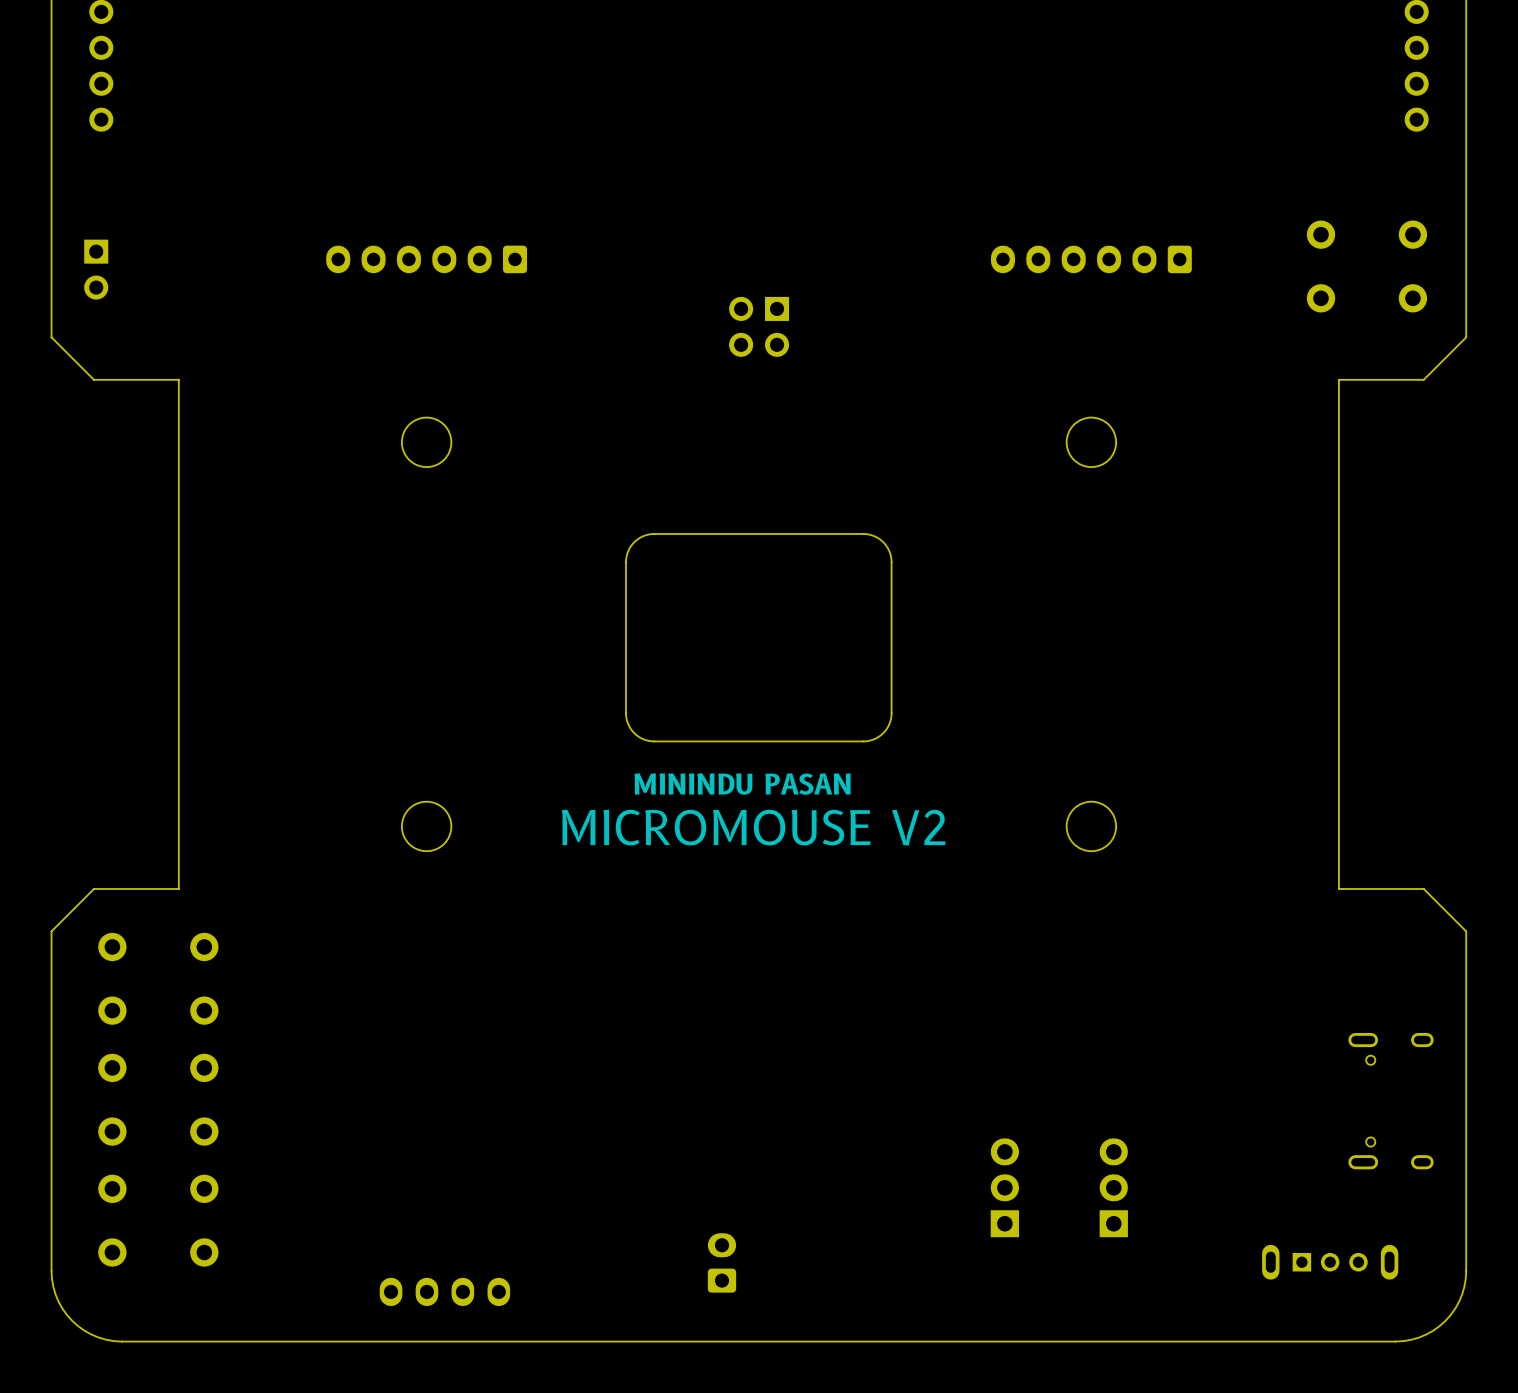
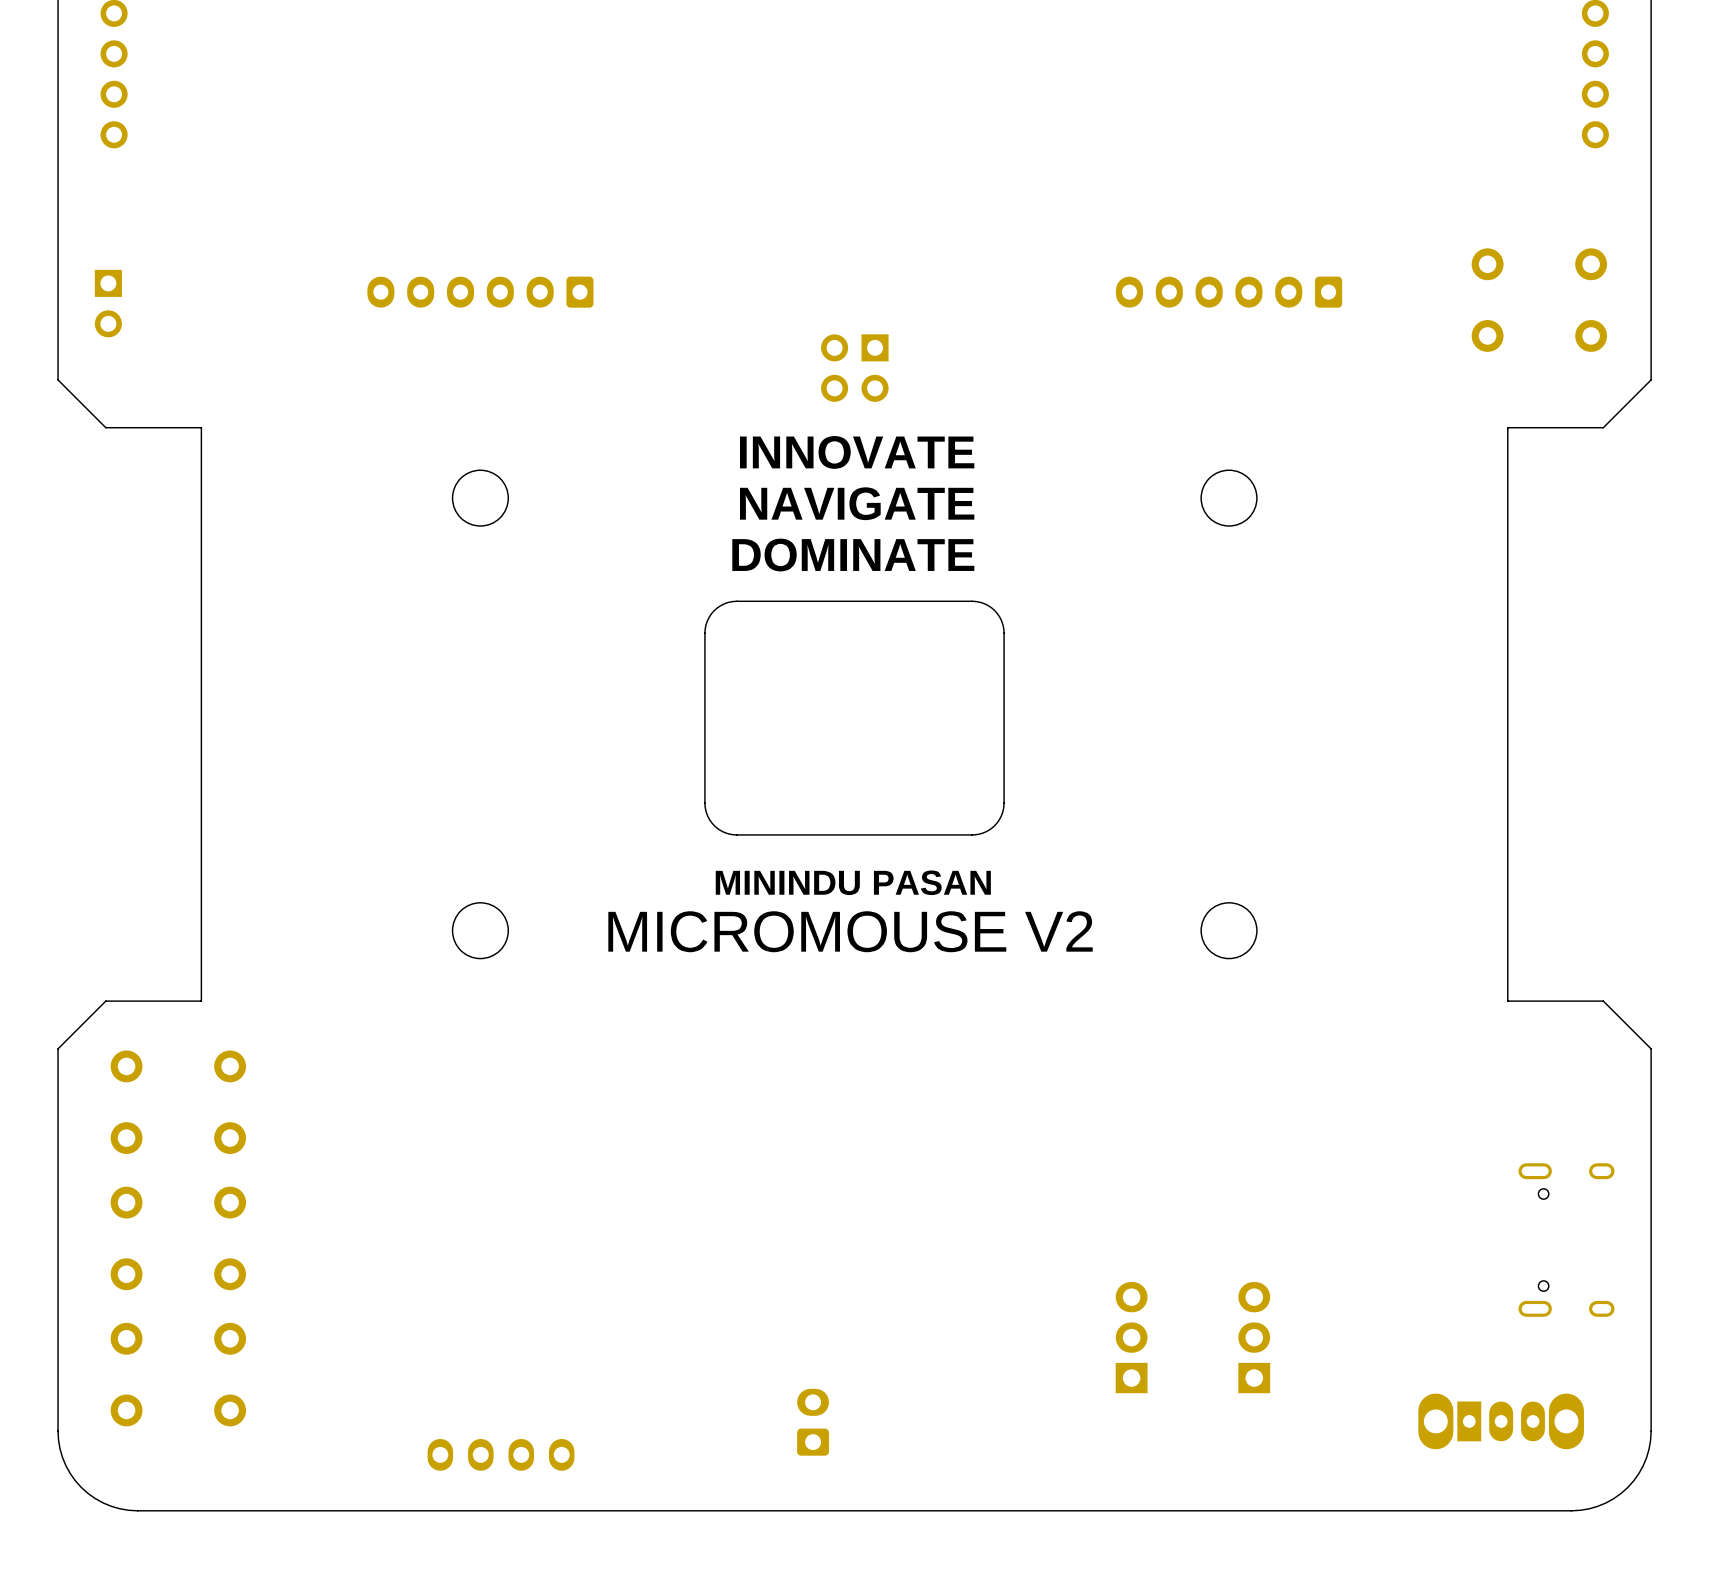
text: none -> INNOVATE (857, 452)
text: none -> NAVIGATE (857, 503)
text: none -> DOMINATE (853, 555)
part footprint: [1262, 1244, 1399, 1280] -> [1418, 1393, 1584, 1450]

